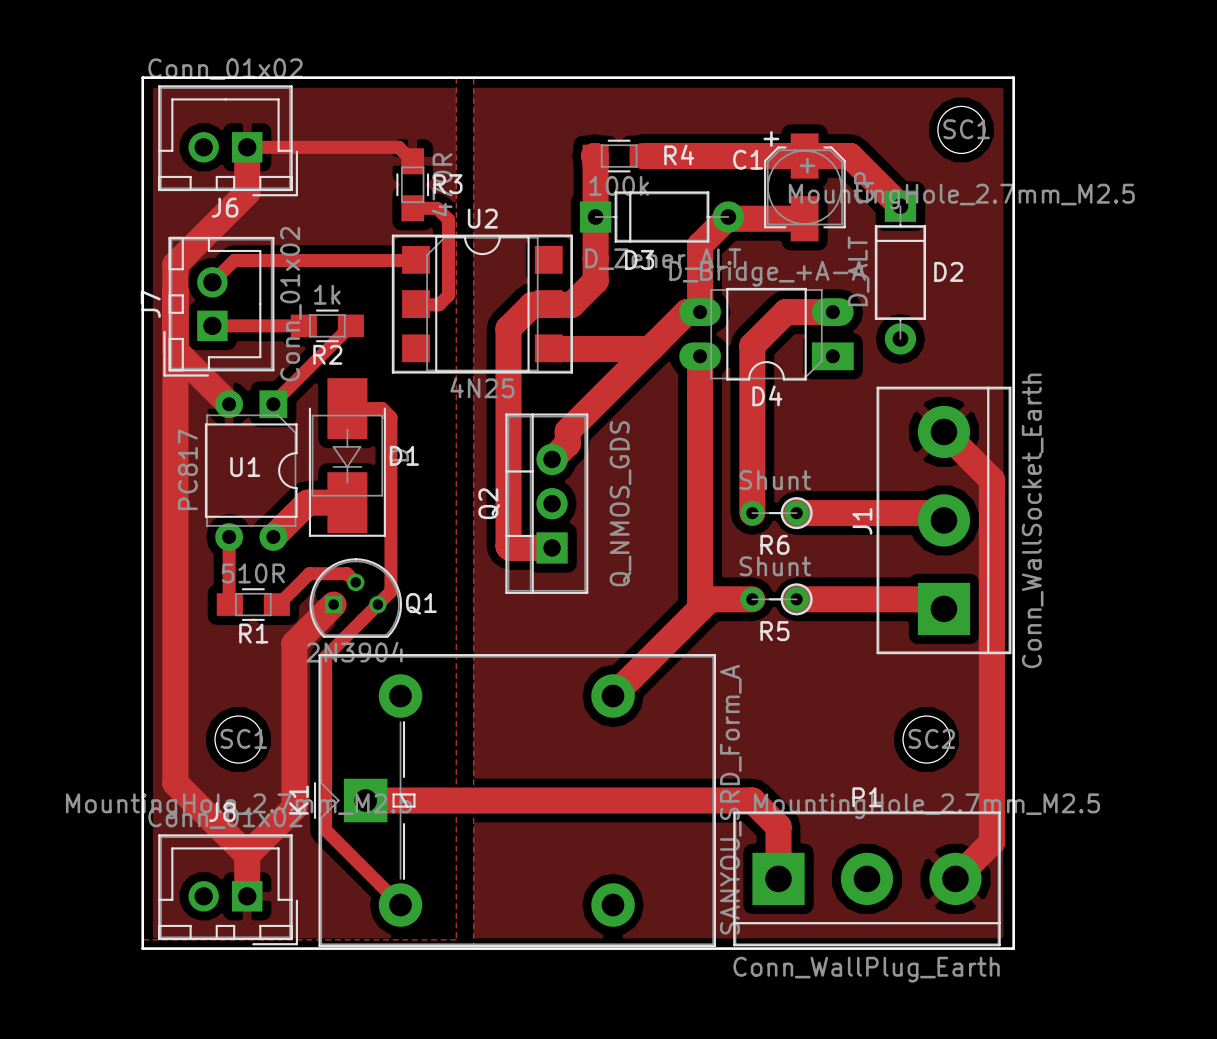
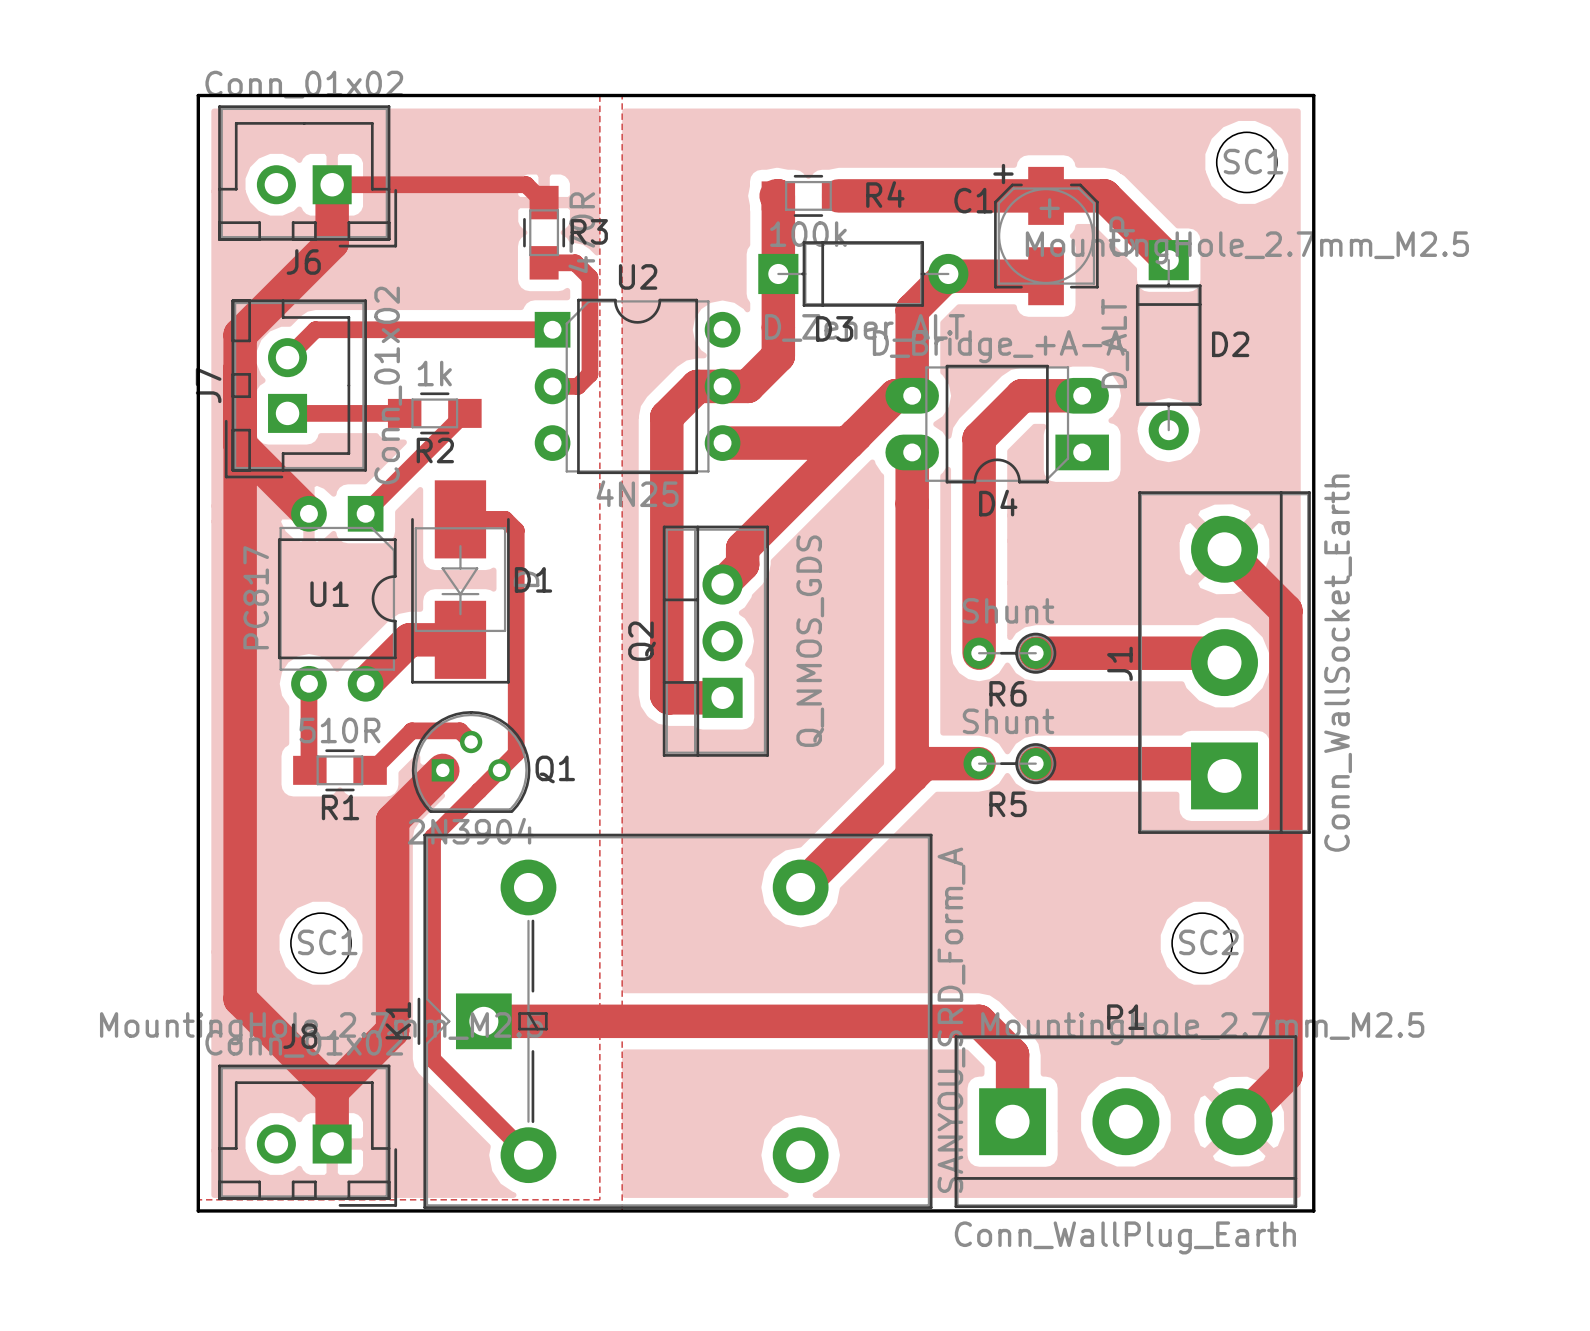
U2 footprint: [391, 234, 573, 374] -> [534, 298, 741, 475]

